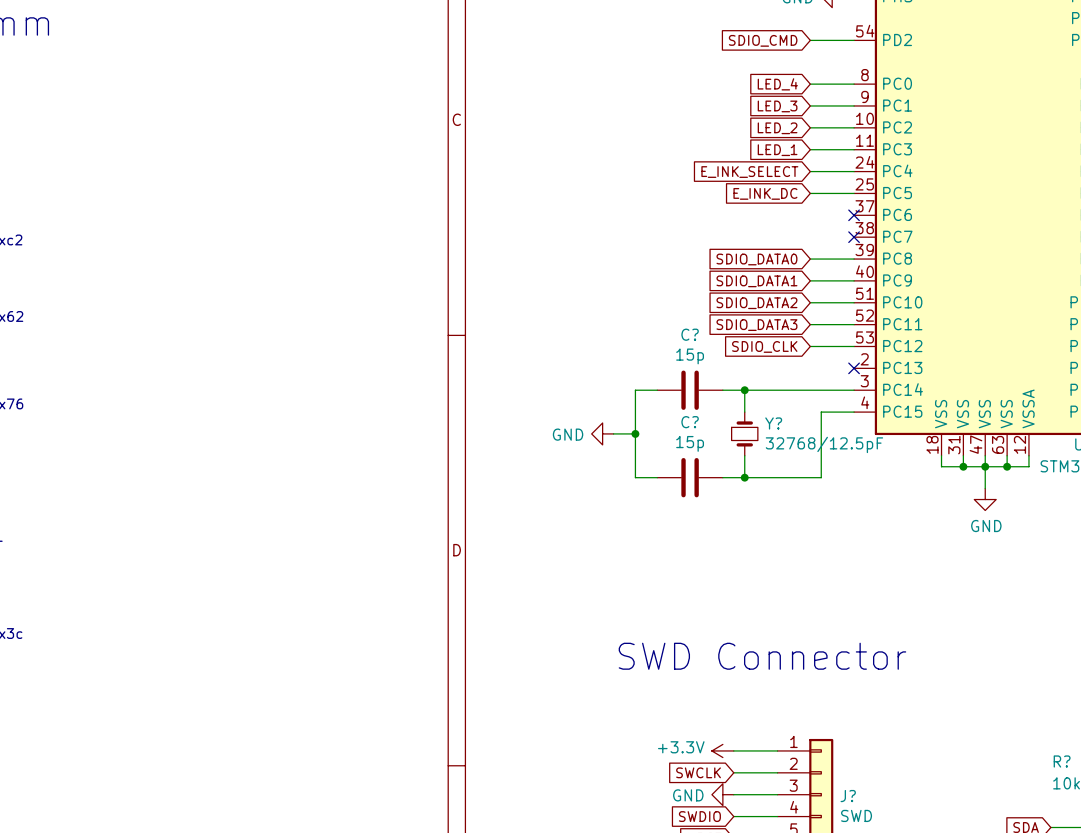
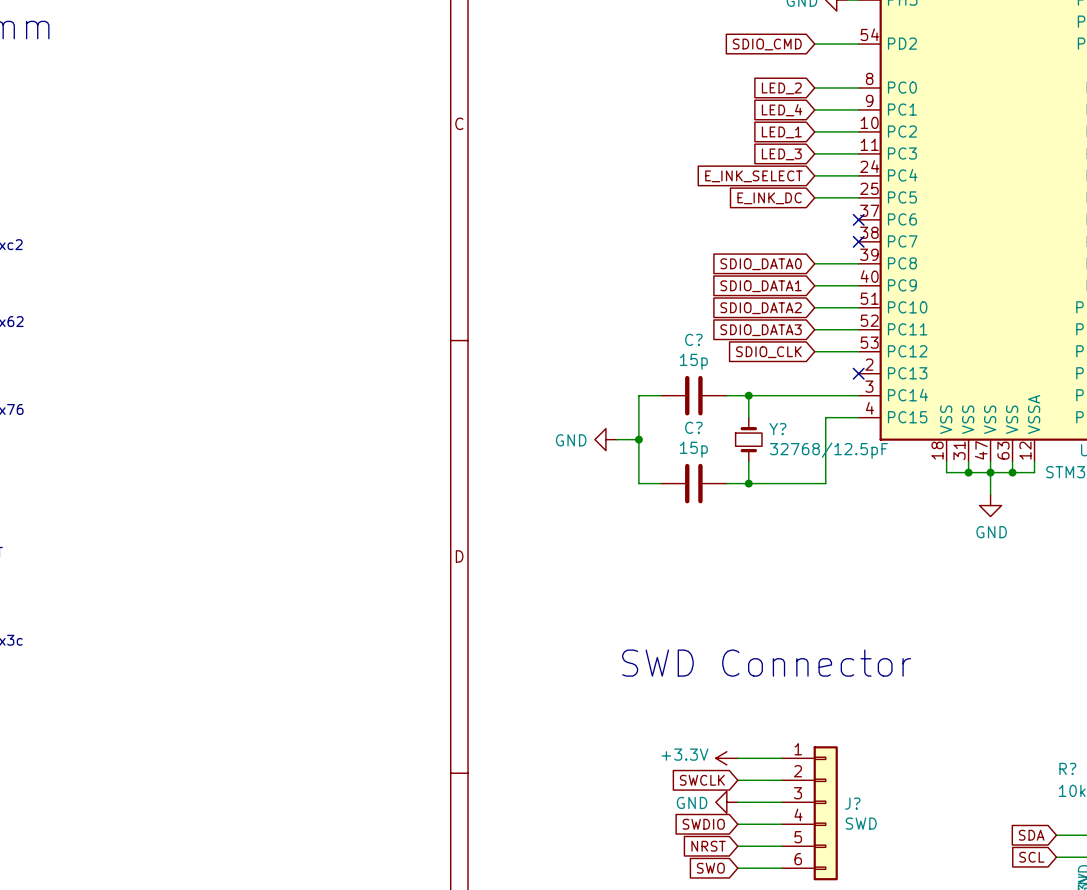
global label: LED_4 (777, 84) -> LED_2 (781, 88)
global label: LED_3 (777, 106) -> LED_4 (782, 110)
global label: LED_2 (777, 128) -> LED_1 (781, 132)
global label: LED_1 (777, 150) -> LED_3 (781, 154)

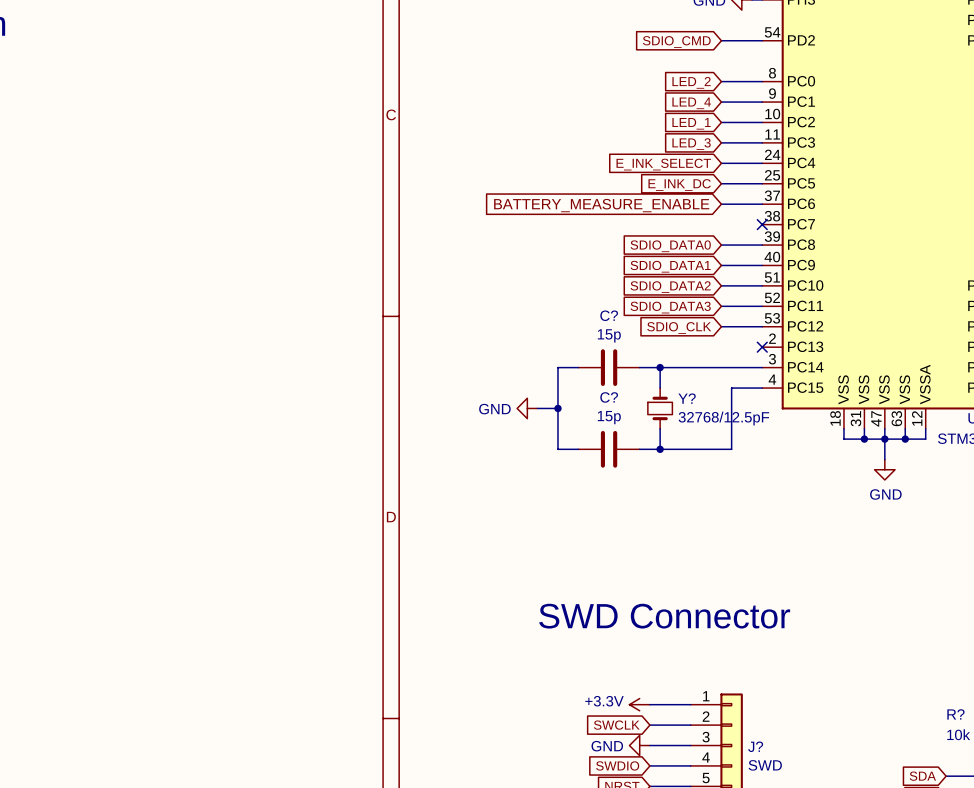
wire: none -> (721, 204) (762, 204)
no-connect mark: (858, 219) -> none
global label: none -> BATTERY_MEASURE_ENABLE (601, 205)

